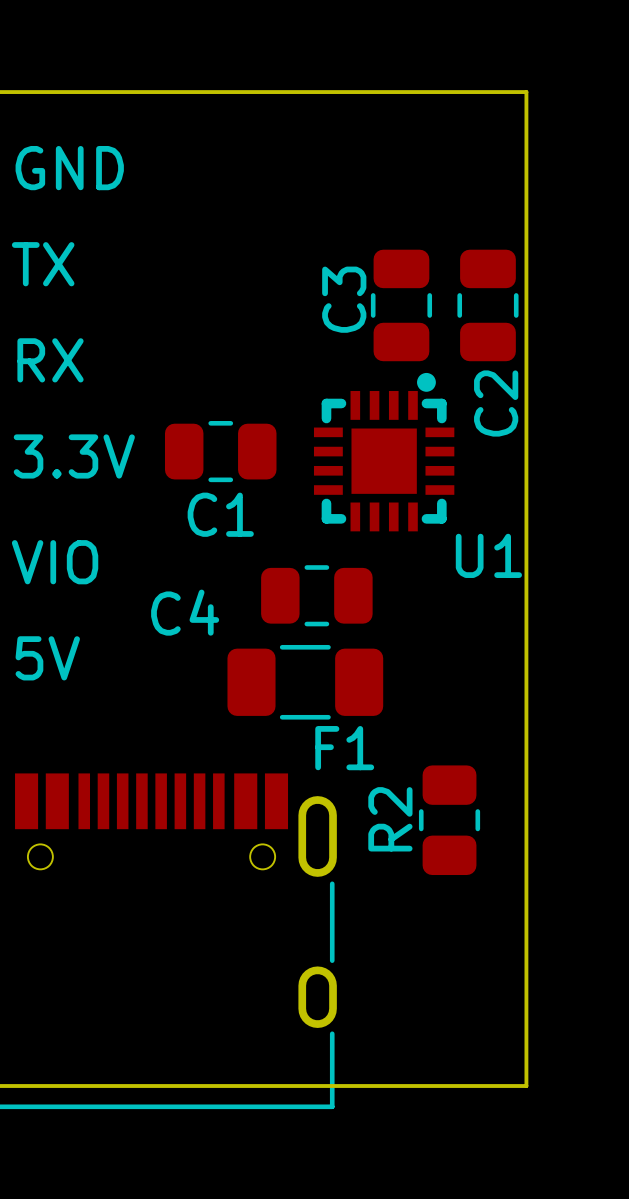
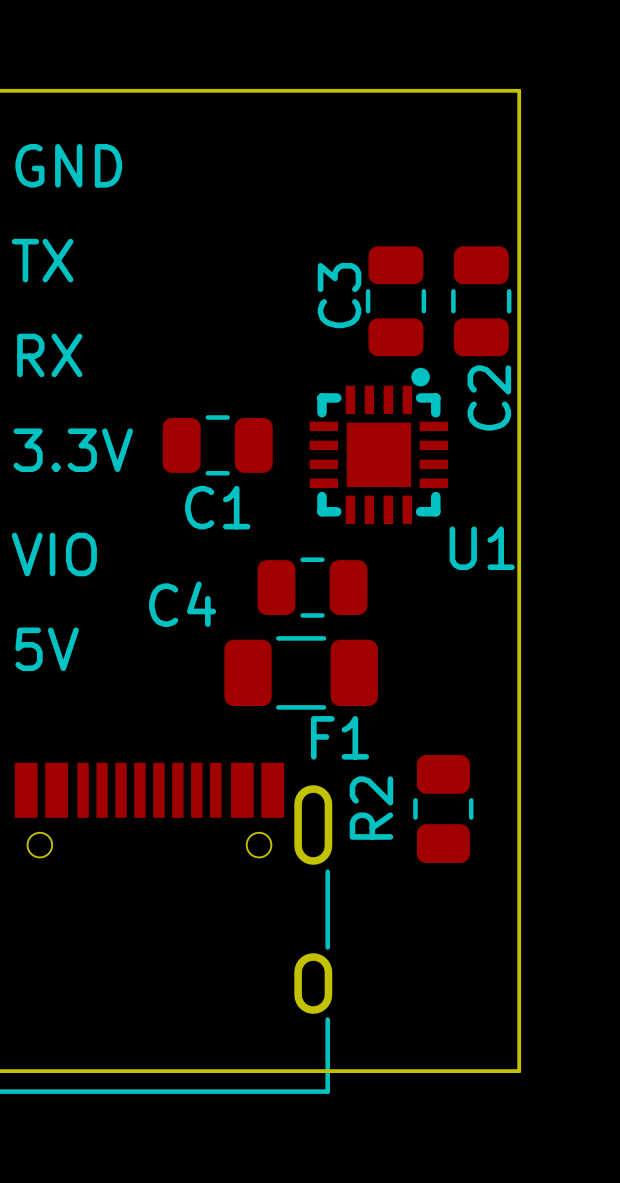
R2 name position: R2 (390, 819) -> R2 (371, 808)

